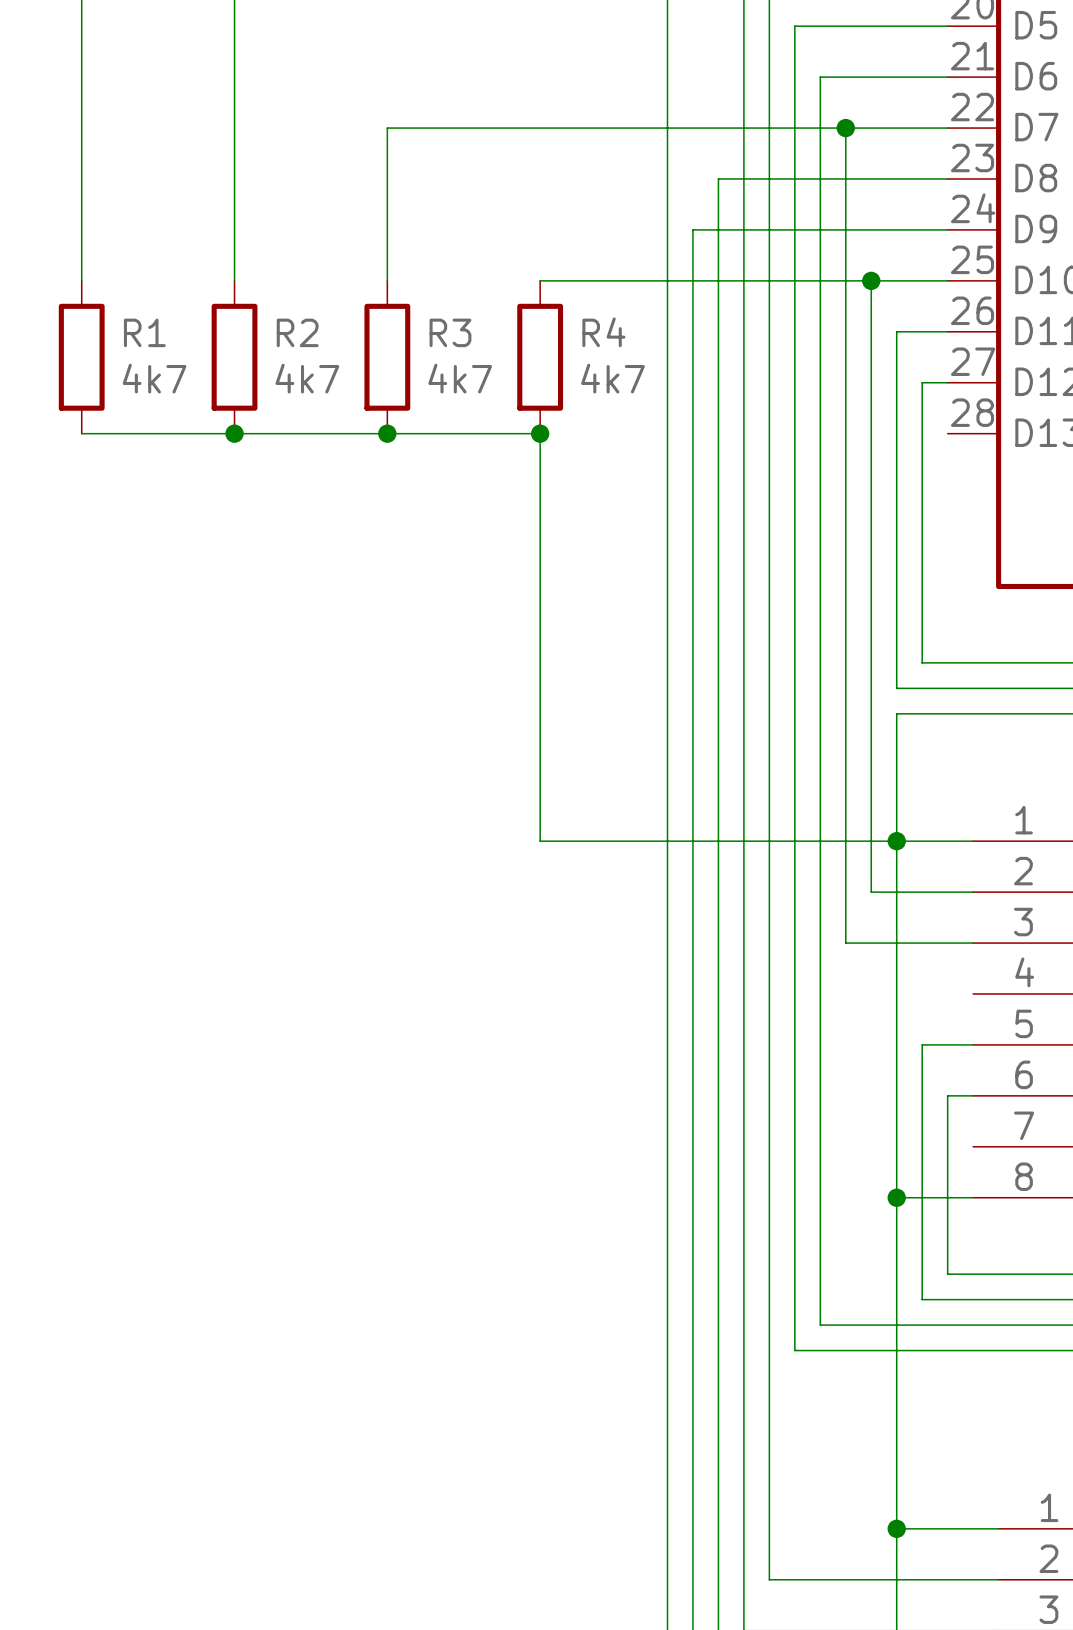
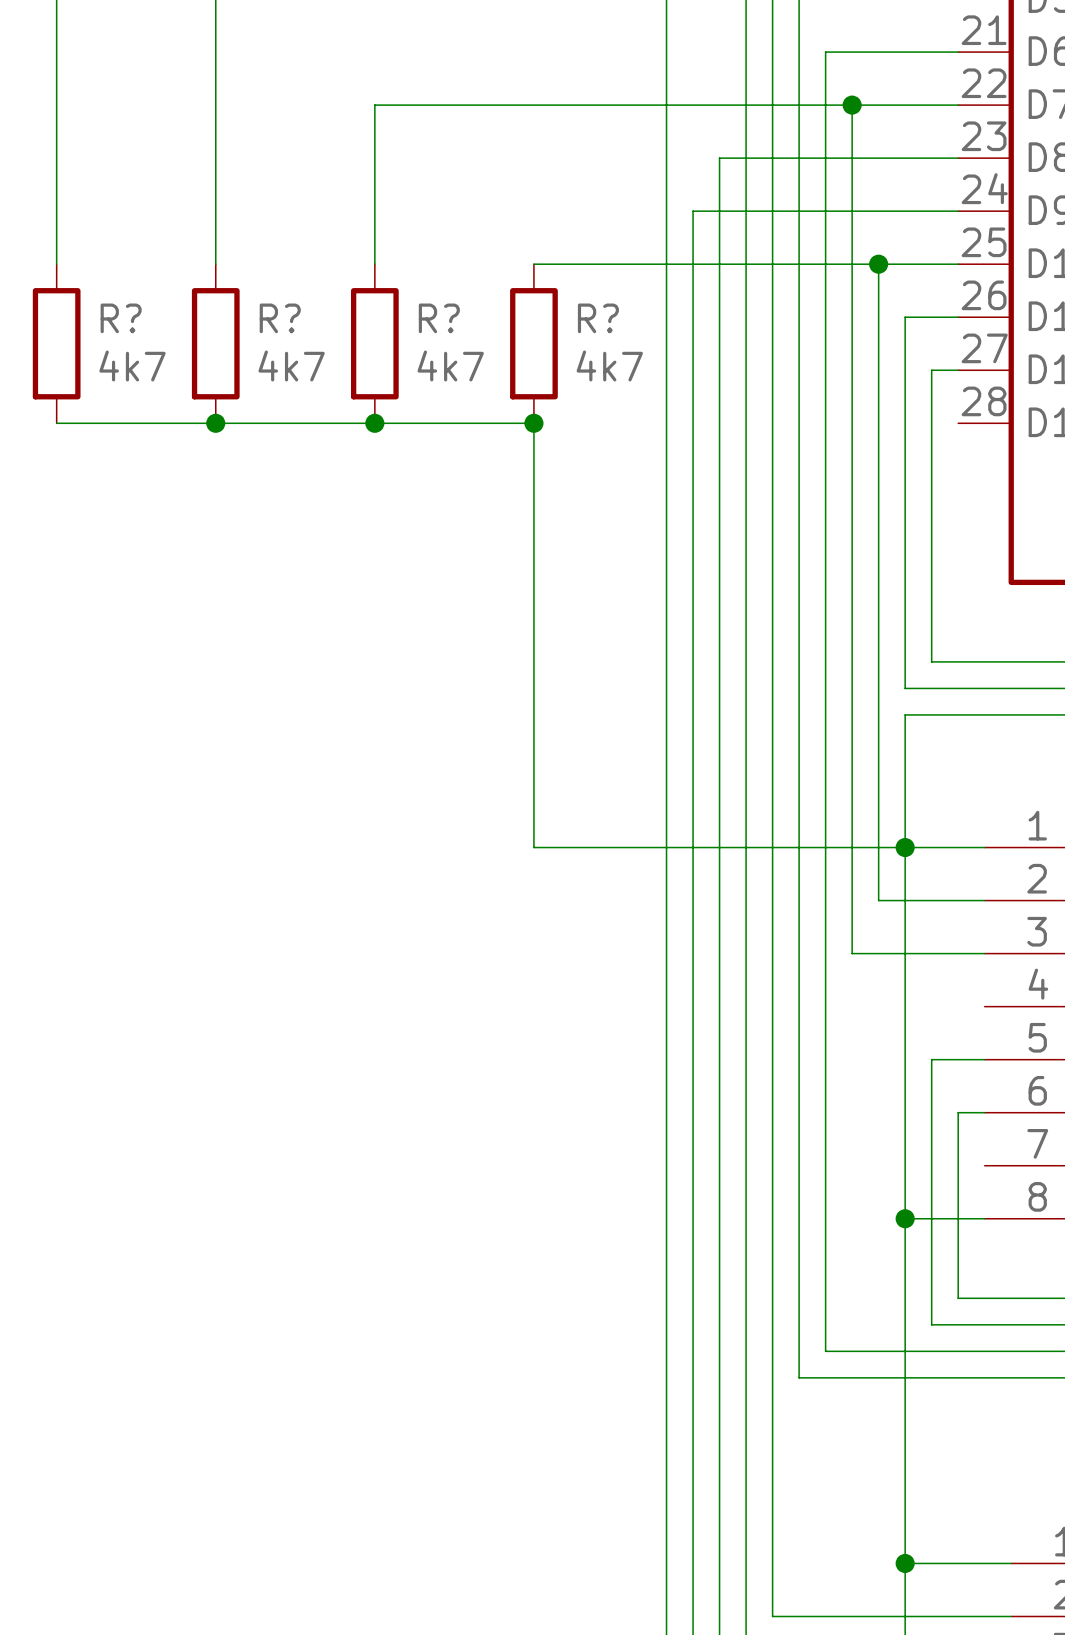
R1 name: R1 (144, 332) -> R? (121, 318)
R2 name: R2 (297, 332) -> R? (280, 318)
R3 name: R3 (450, 332) -> R? (439, 318)
R4 name: R4 (603, 332) -> R? (598, 318)

